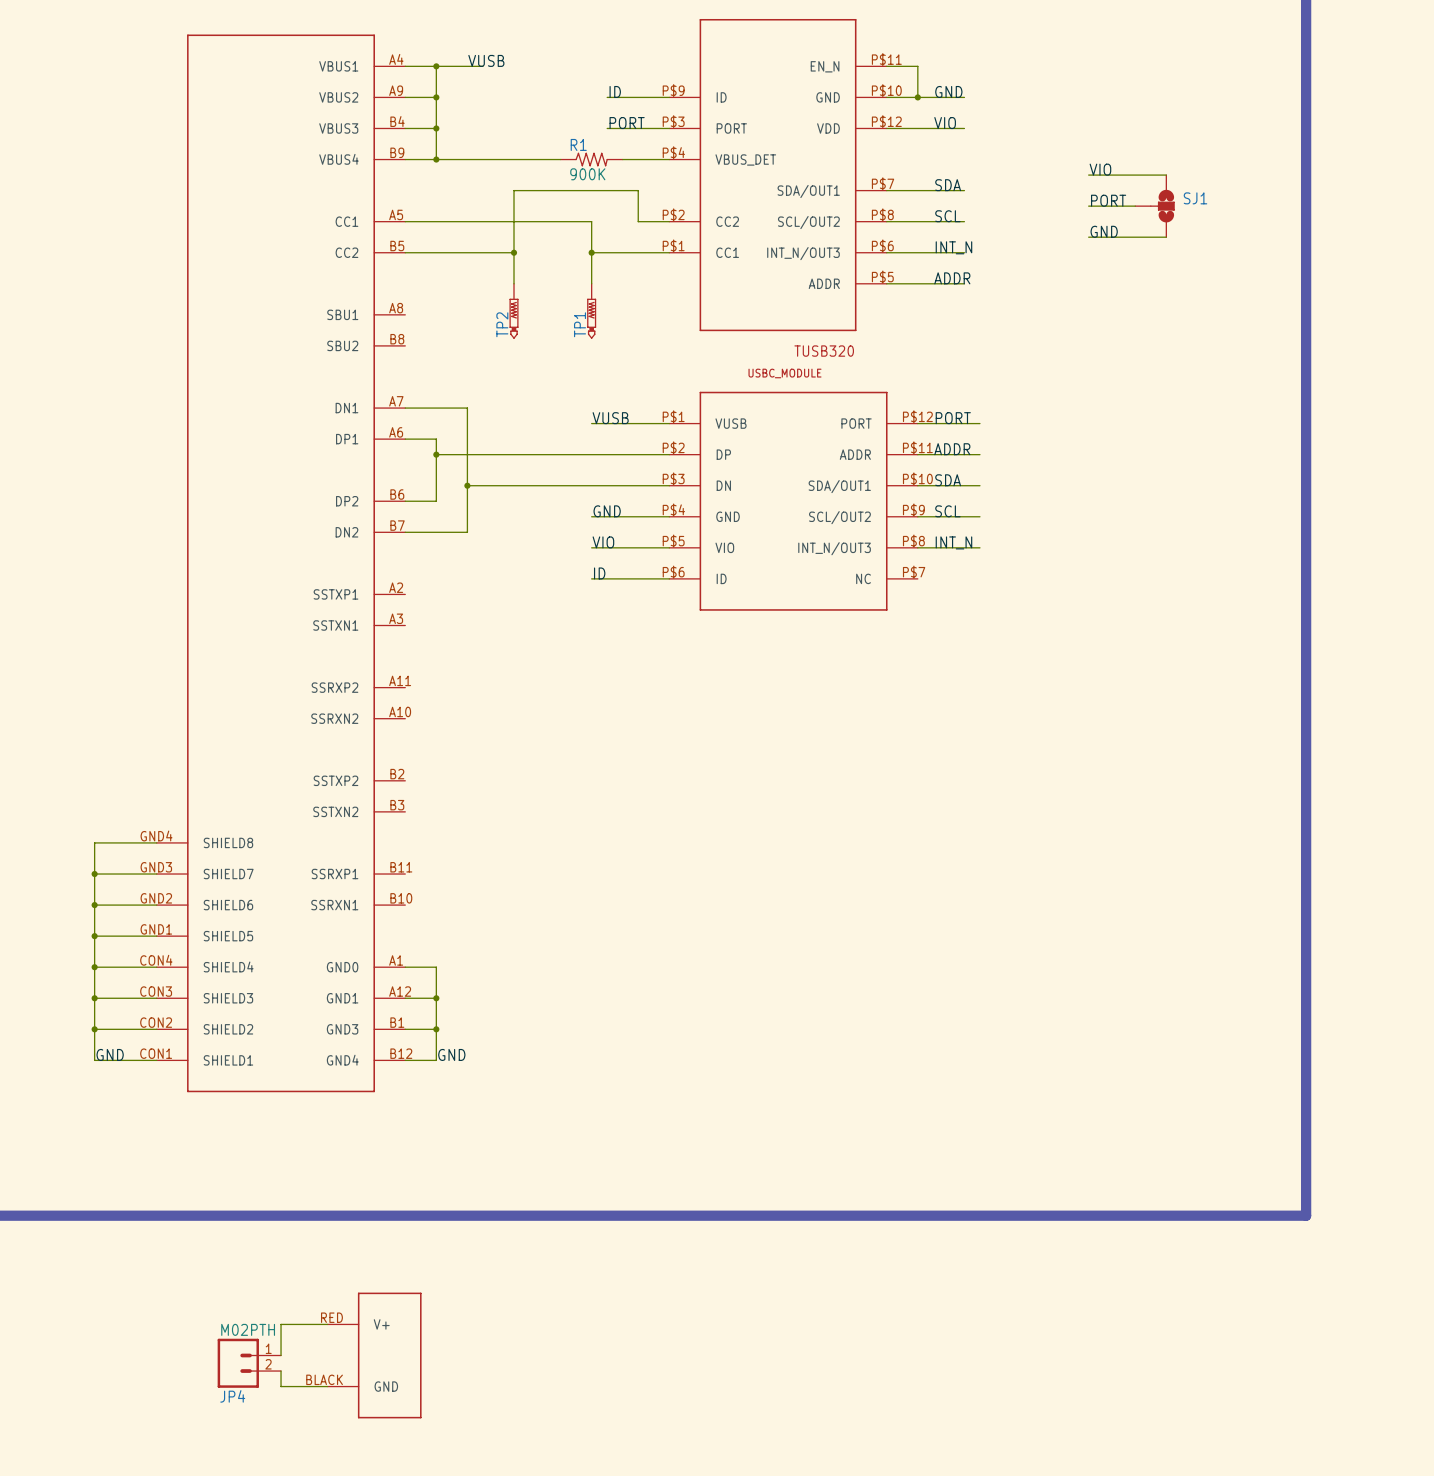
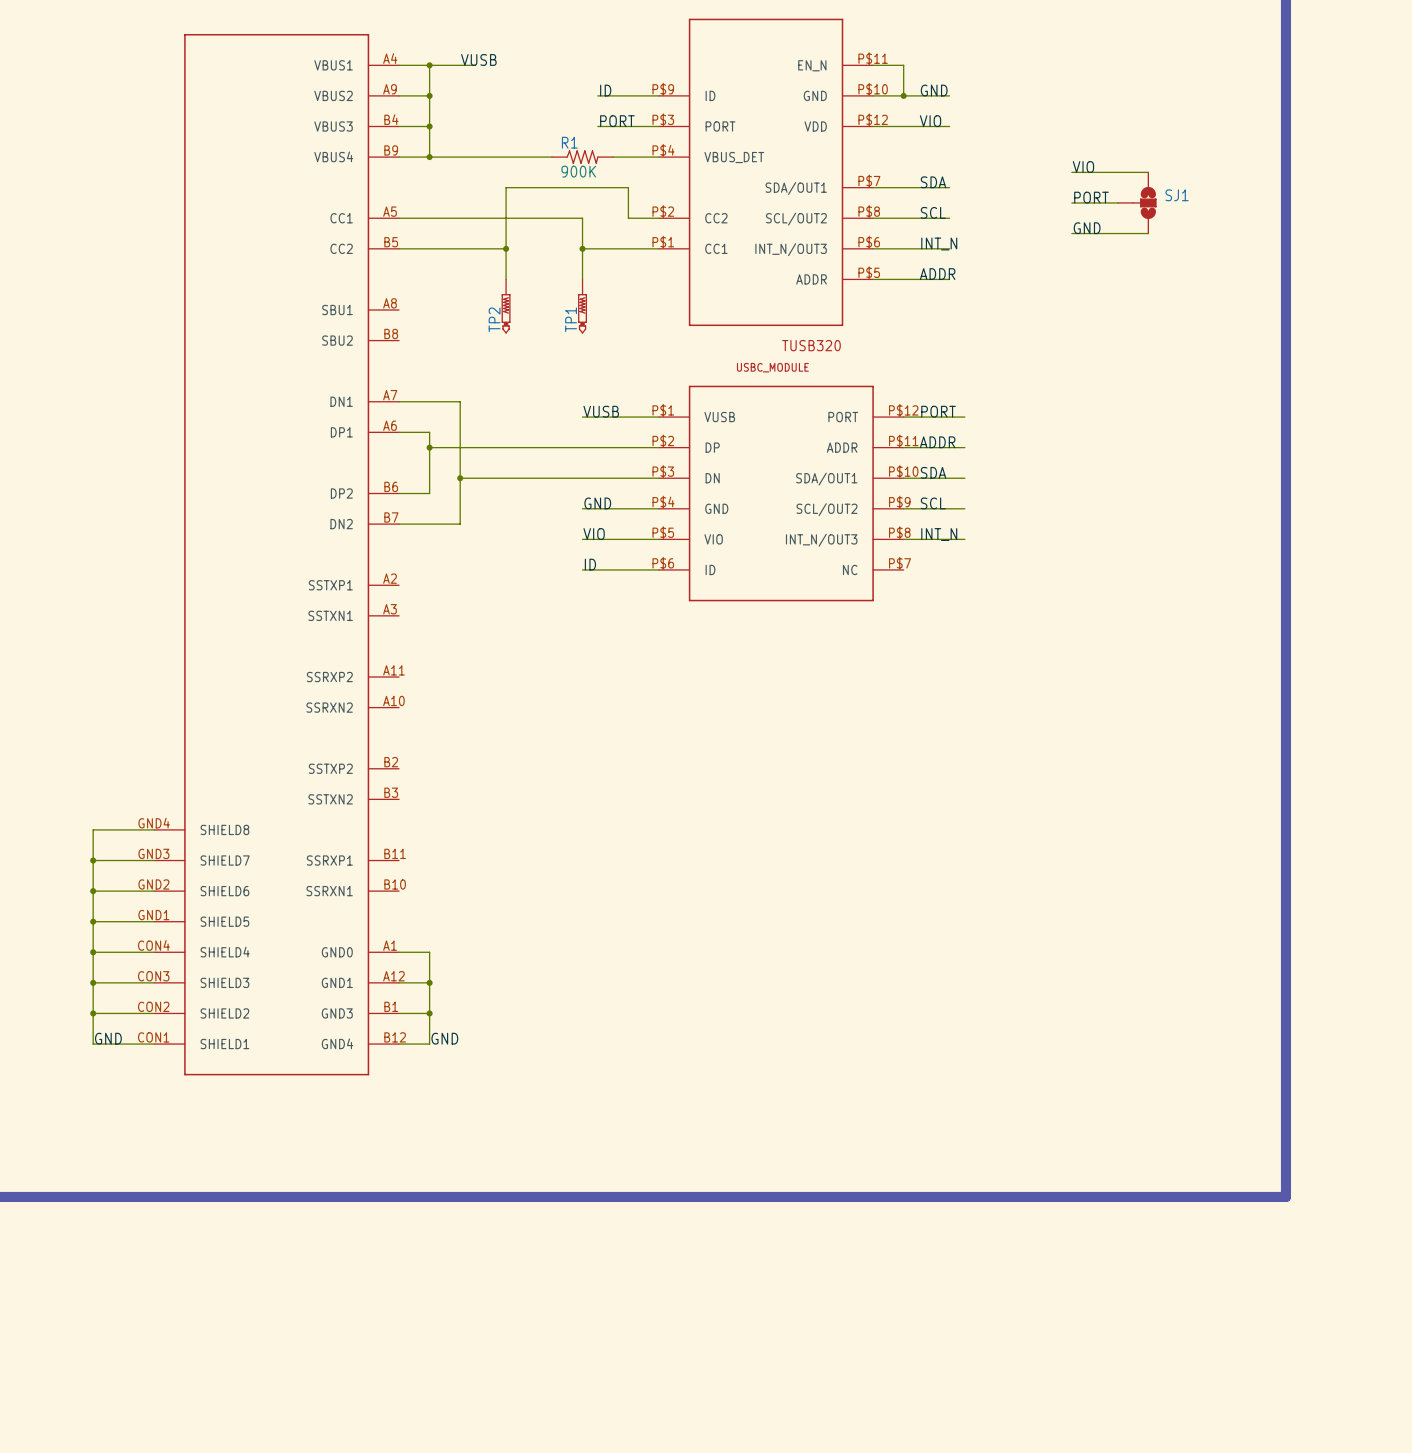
wire: (327, 1324) (281, 1324) (281, 1355) -> none
part: (374, 1355) -> none
JP4: M02PTH (249, 1363) -> none
wire: (281, 1371) (281, 1386) (327, 1386) -> none

